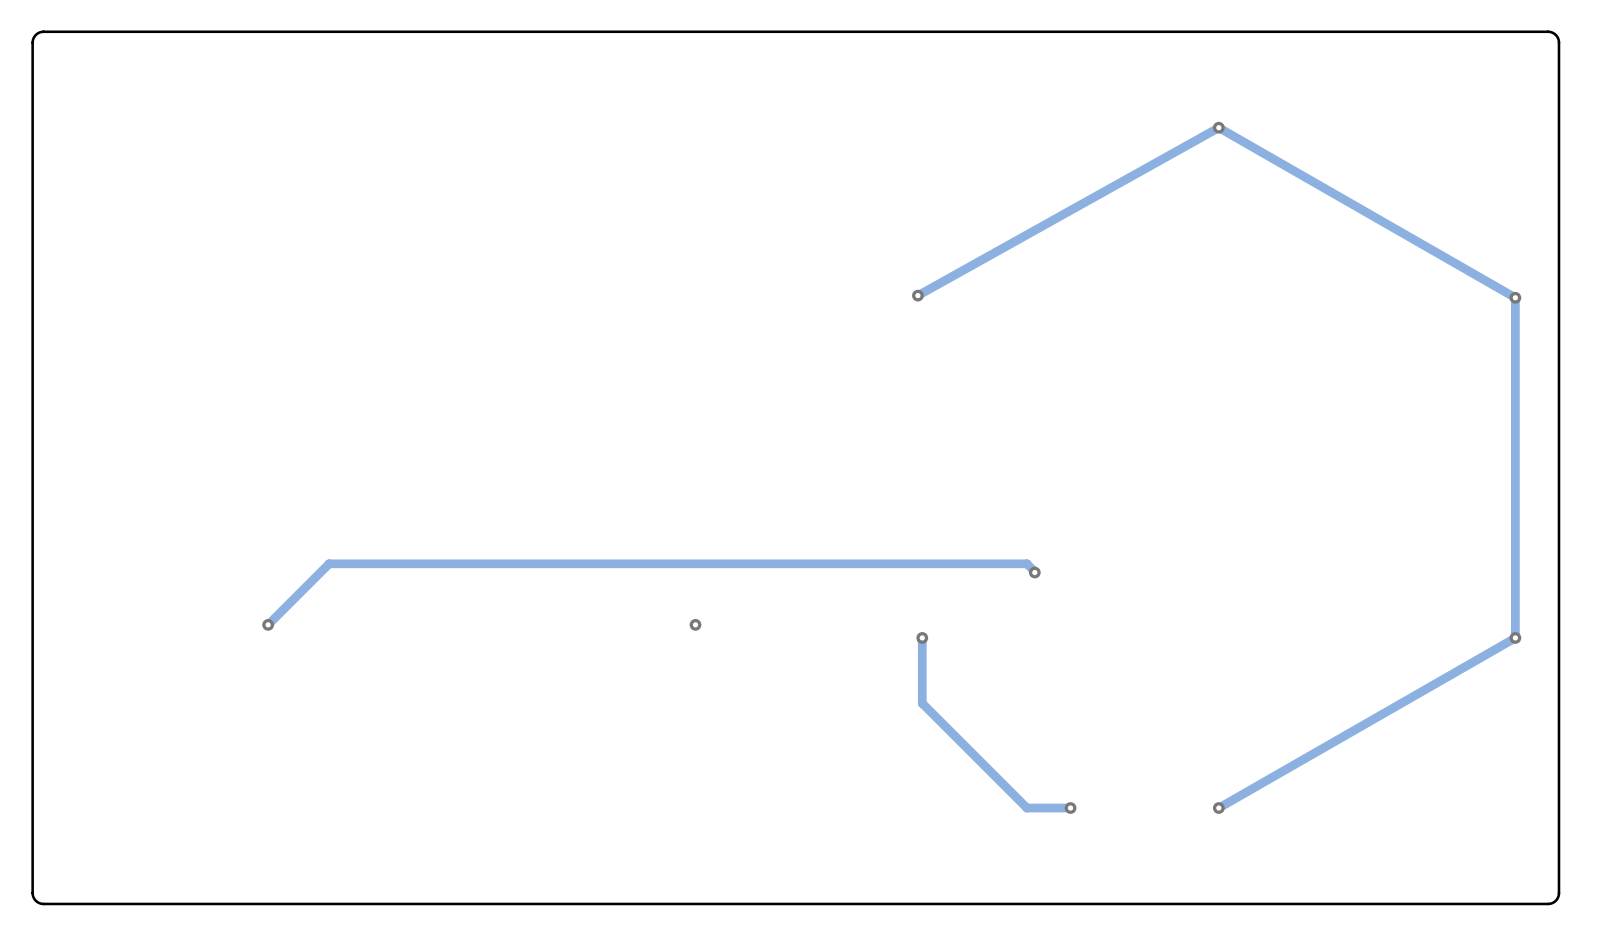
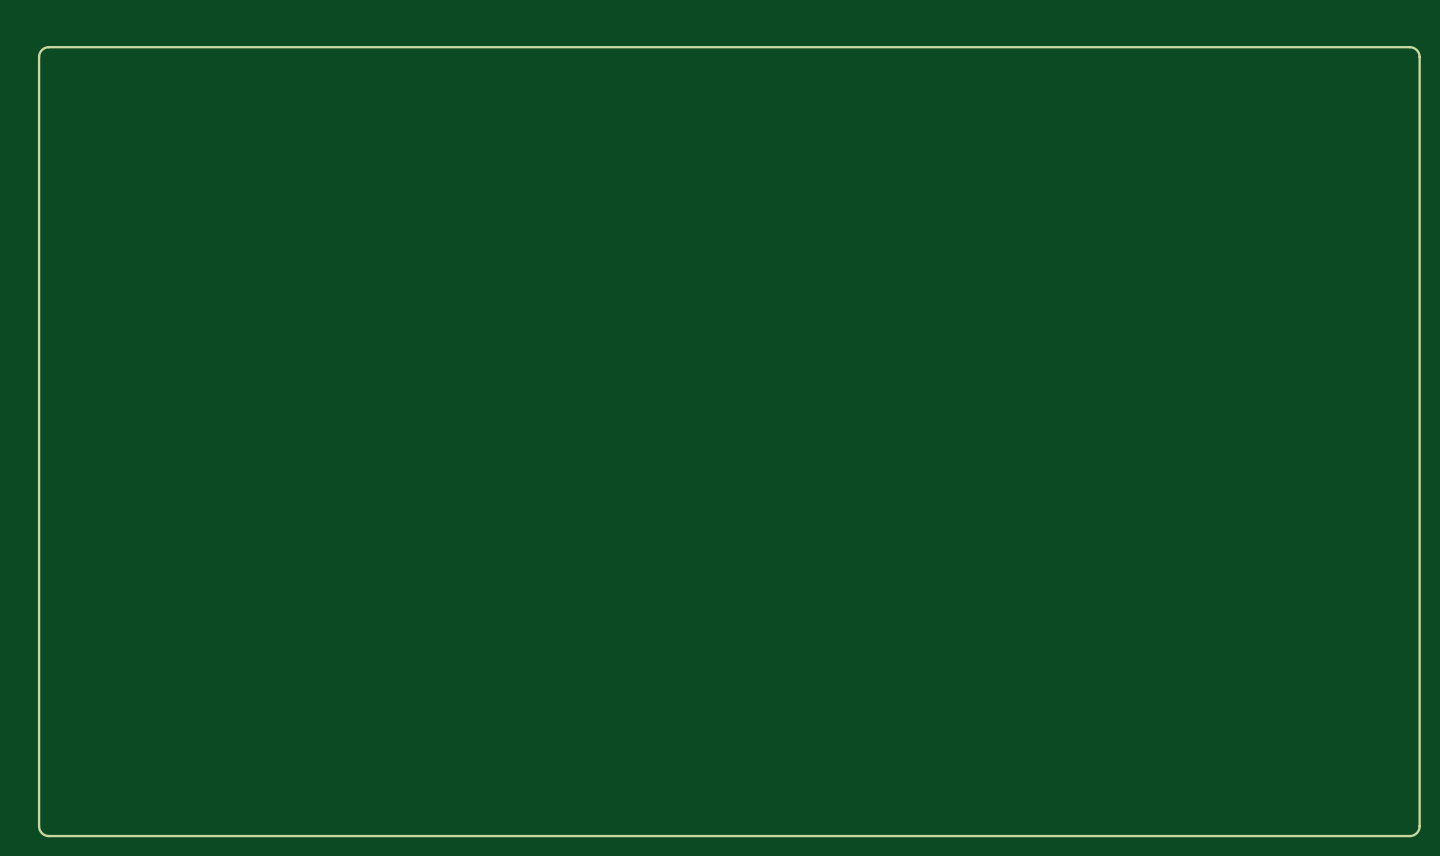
via: (1218, 127) -> none
track: (917, 295) (1218, 127) (1515, 297) (1515, 637) (1218, 808) -> none
via: (917, 295) -> none
via: (1515, 297) -> none
via: (1034, 572) -> none
track: (1035, 572) (1026, 563) (329, 563) (268, 624) -> none
via: (268, 624) -> none
via: (695, 624) -> none
track: (922, 637) (922, 703) (1026, 808) (1070, 808) -> none
via: (922, 637) -> none
via: (1515, 637) -> none
via: (1070, 808) -> none
via: (1218, 808) -> none

